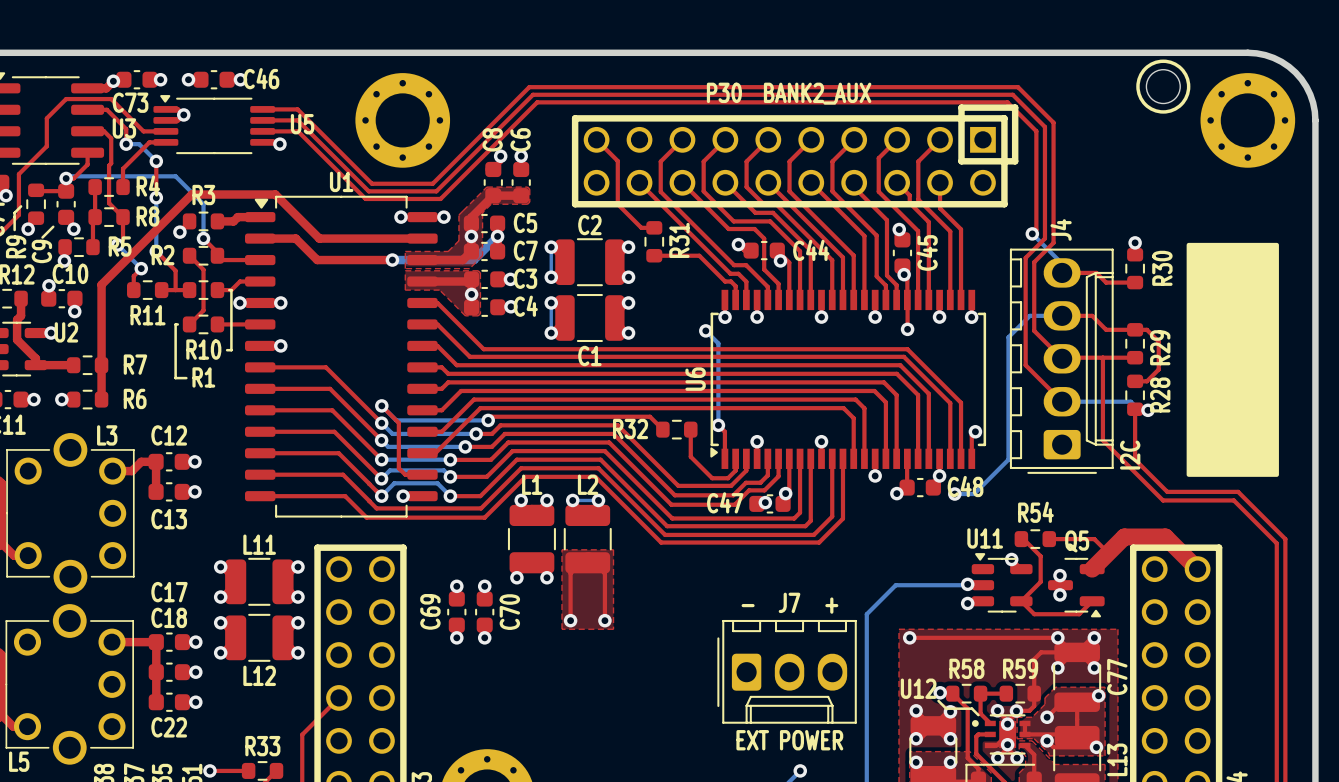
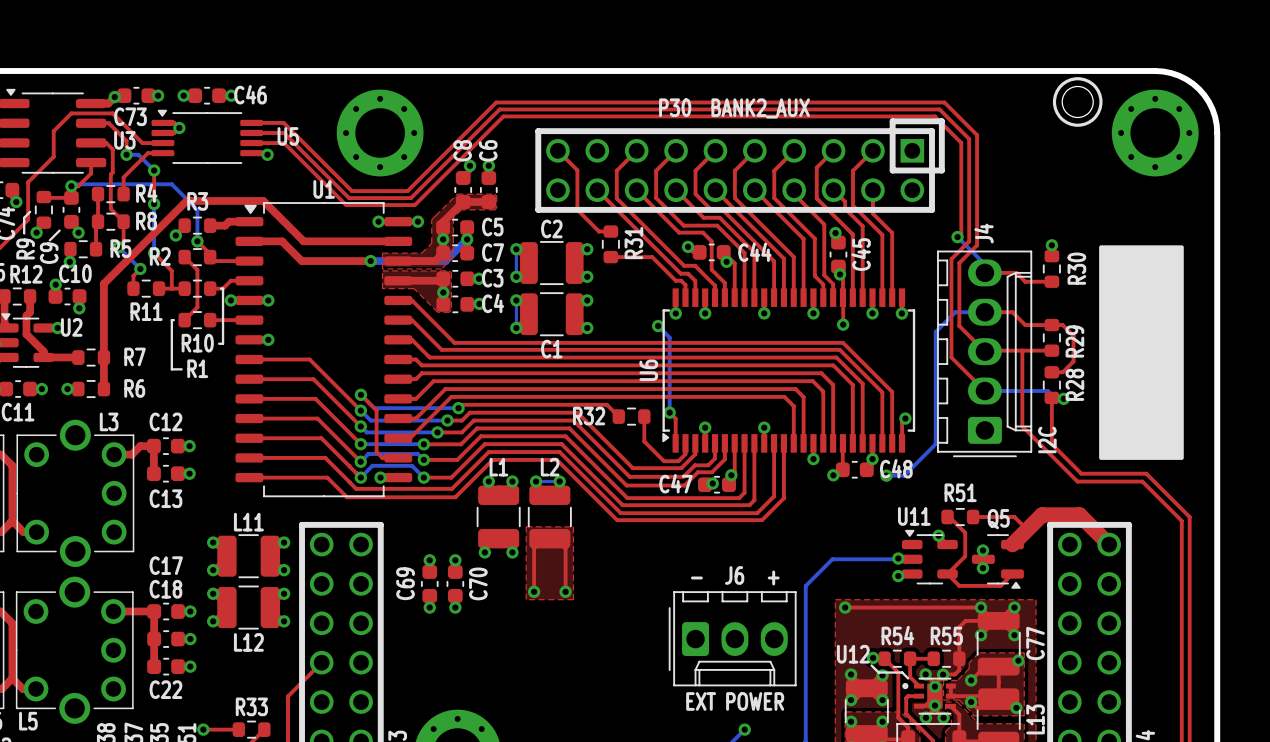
R54 name: R54 (1035, 512) -> R51 (960, 492)
J7 name: J7 (789, 602) -> J6 (734, 575)
R58 name: R58 (966, 668) -> R54 (897, 635)
R59 name: R59 (1020, 668) -> R55 (946, 635)

